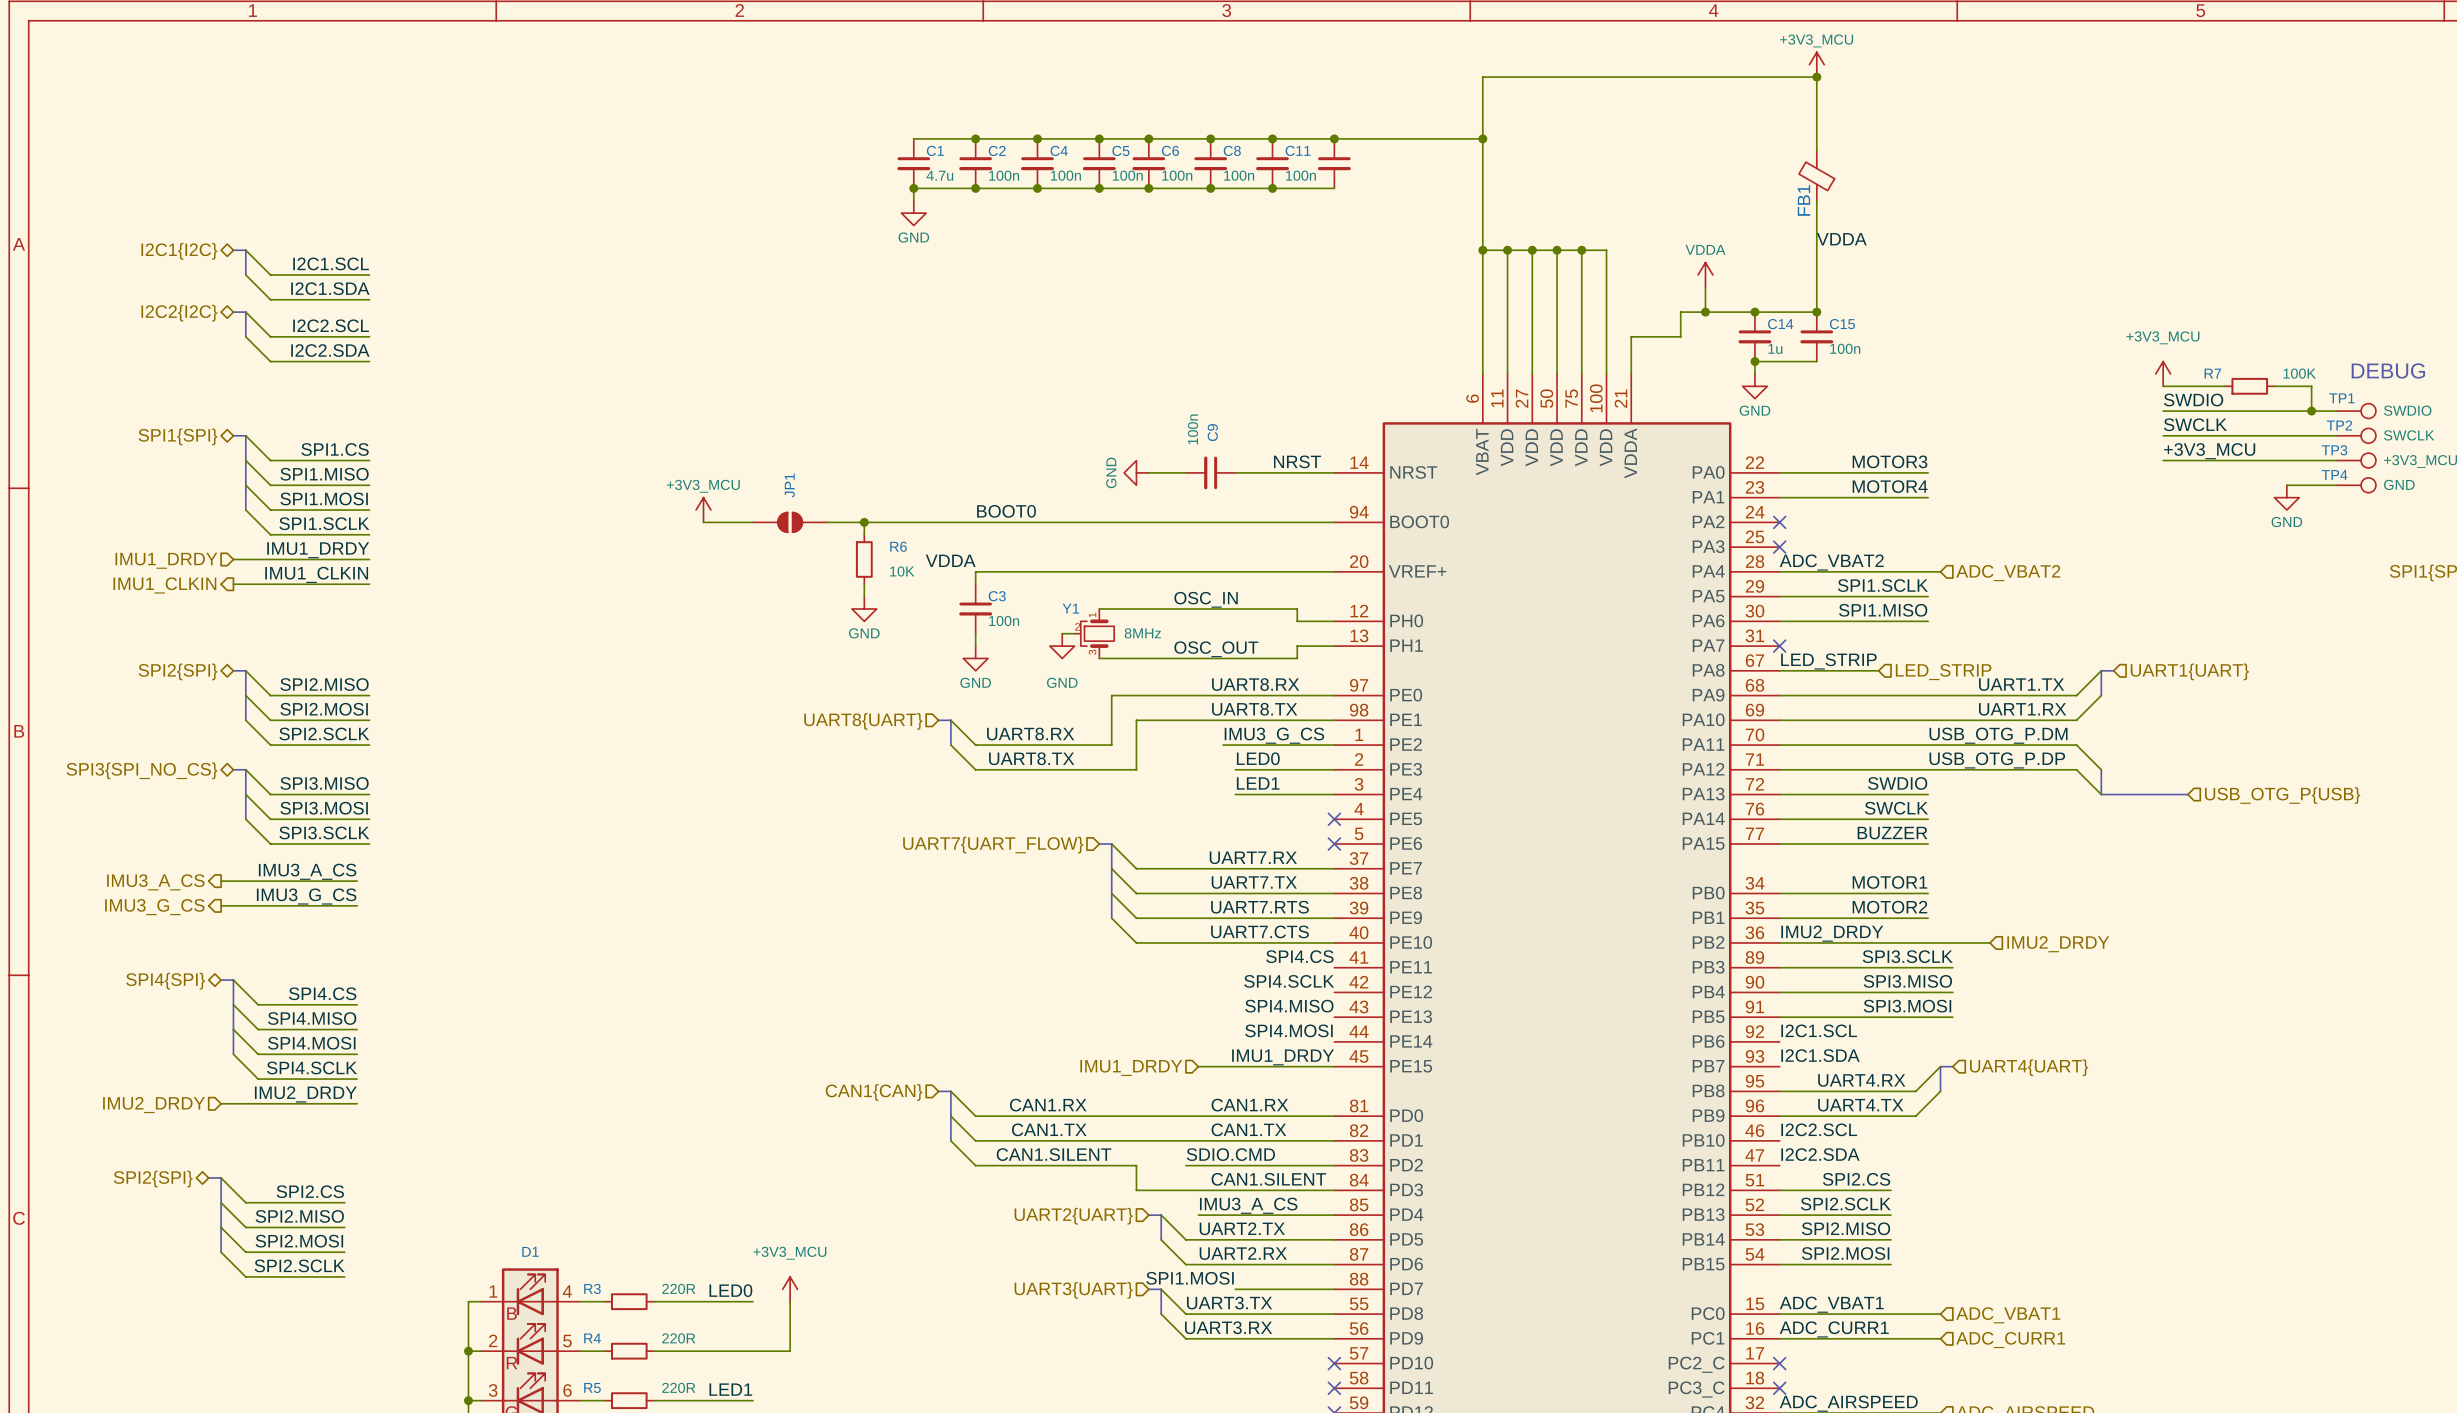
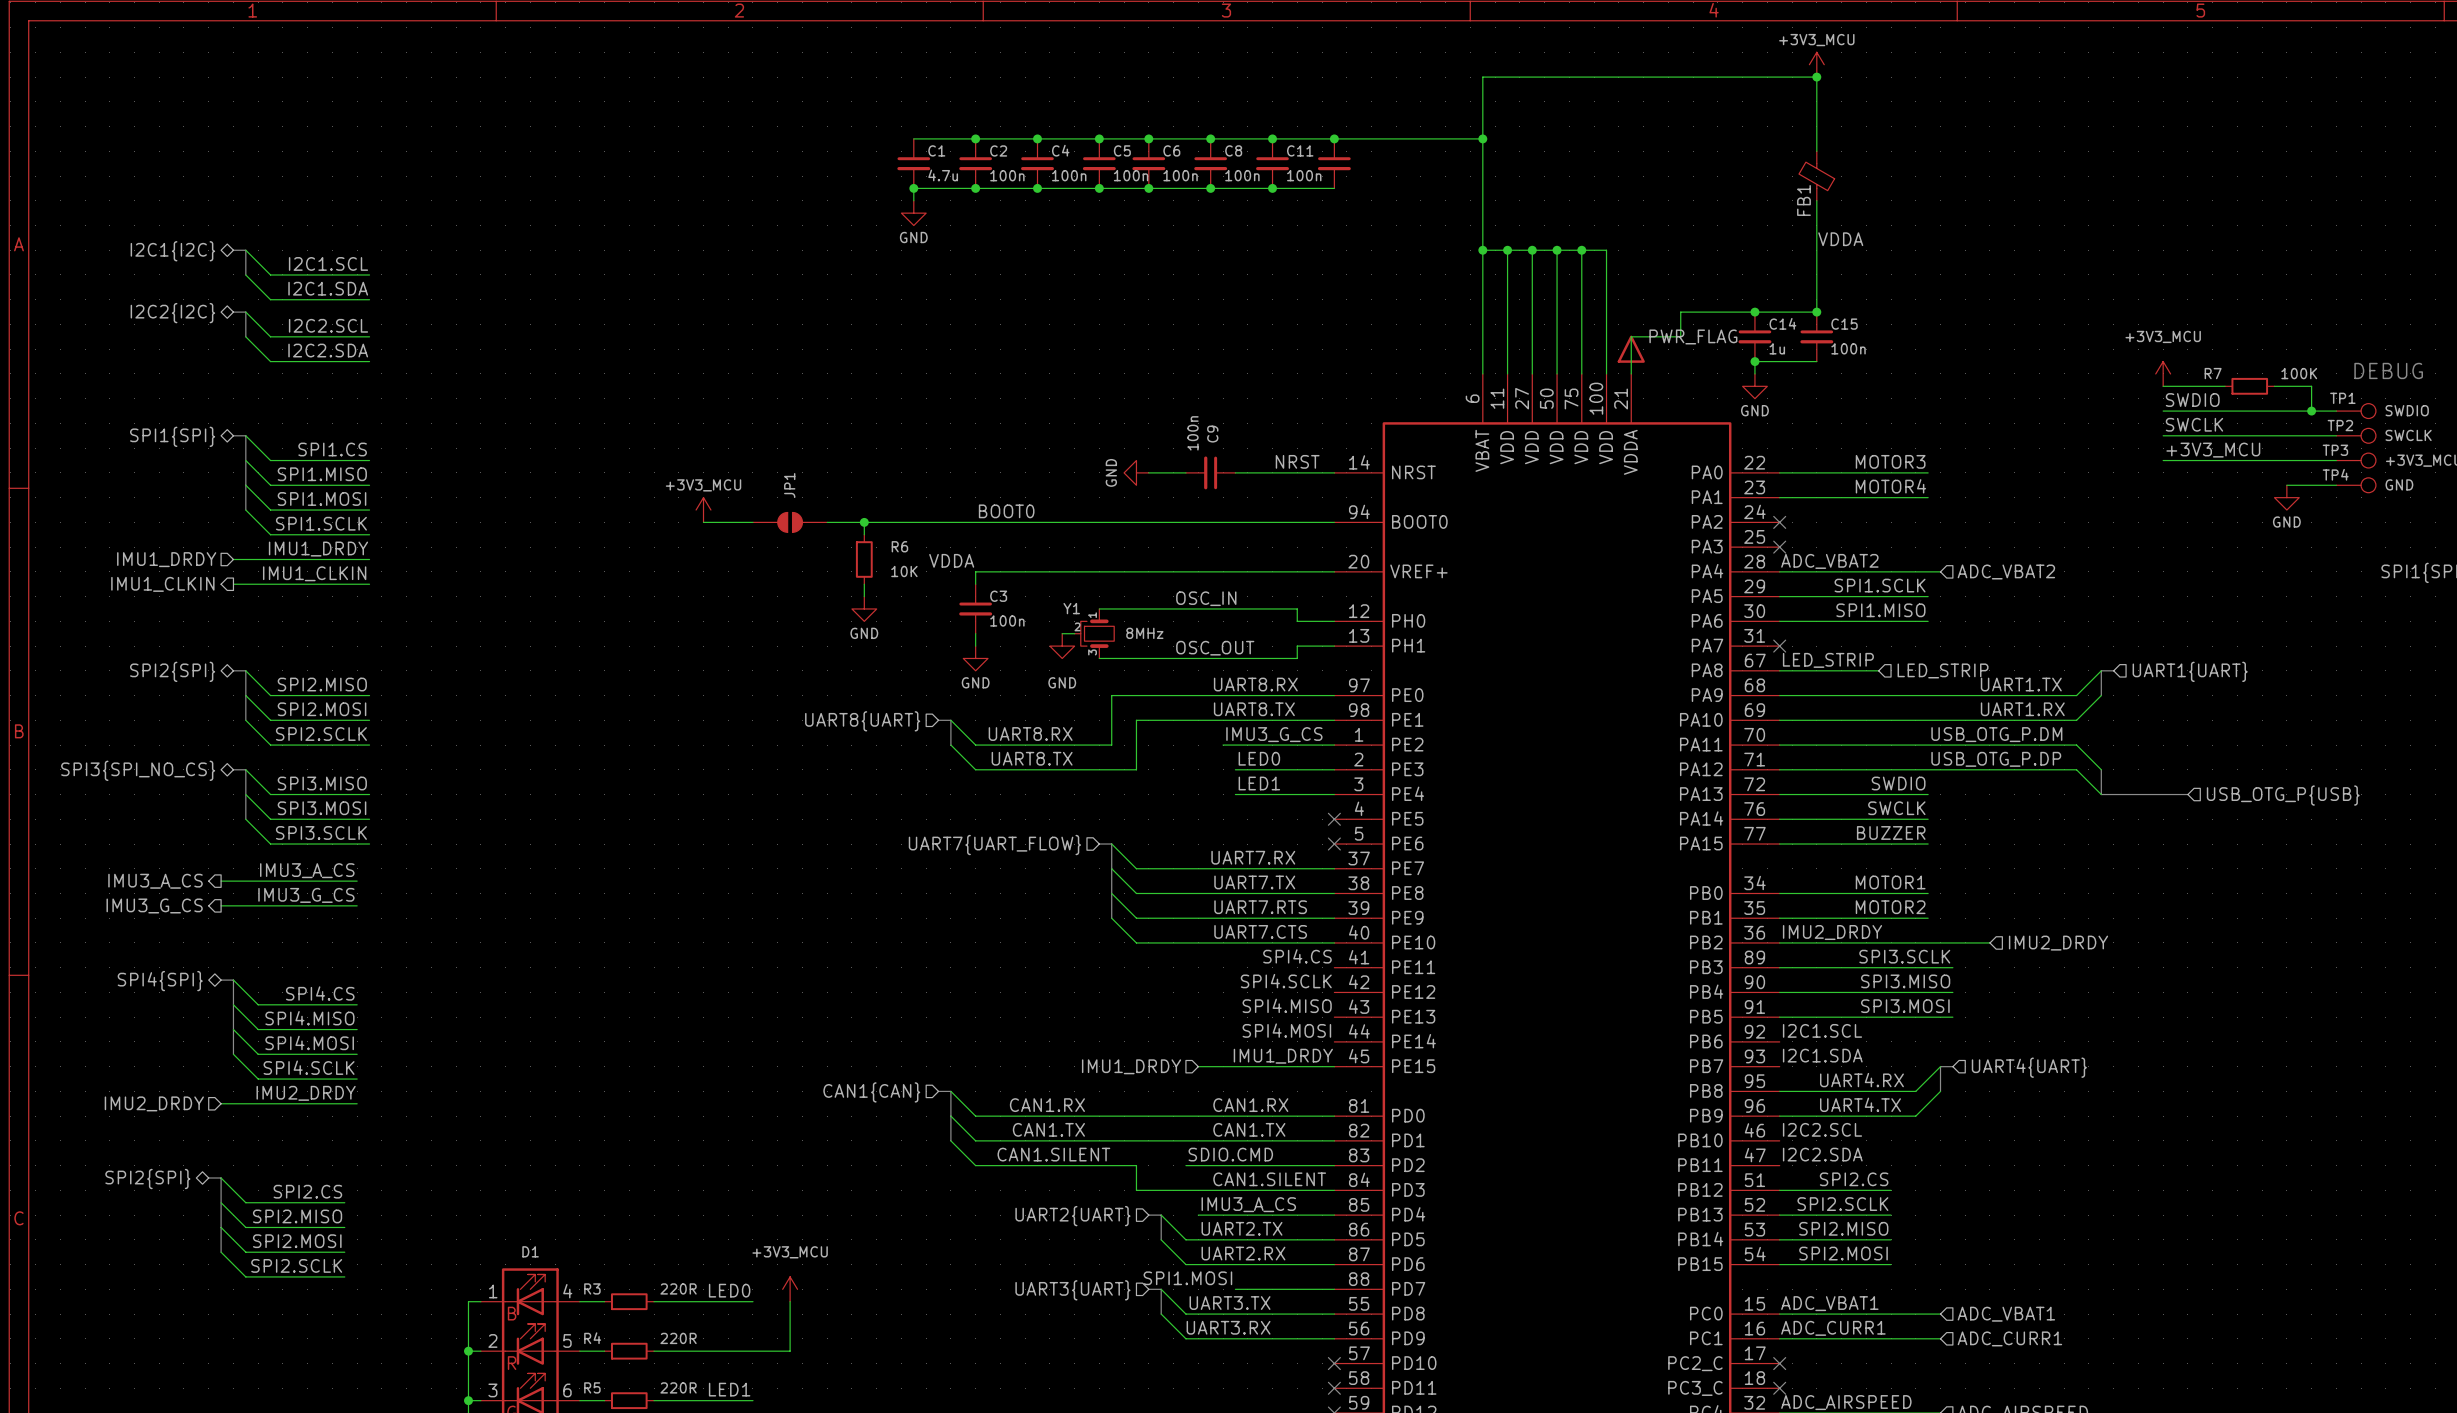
power symbol: VDDA (1705, 274) -> none
wire: (1705, 287) (1705, 312) -> none
junction: (1705, 312) -> none
power symbol: none -> PWR_FLAG (1631, 349)

